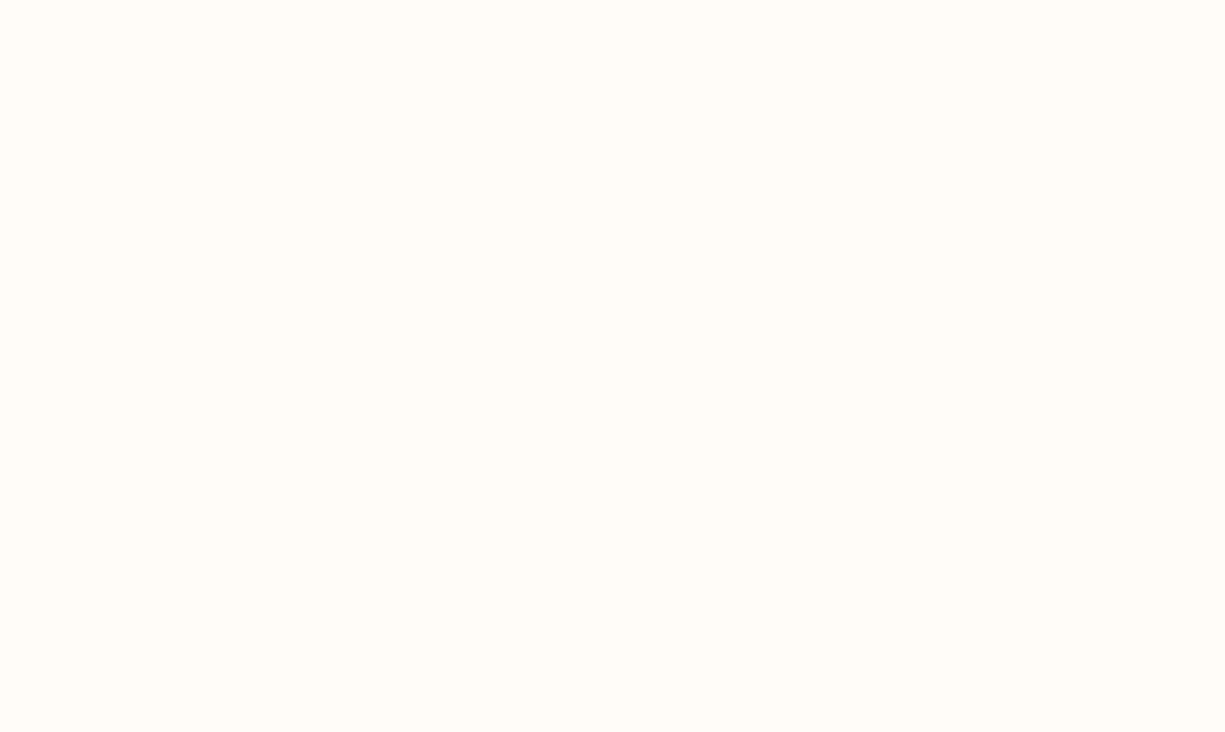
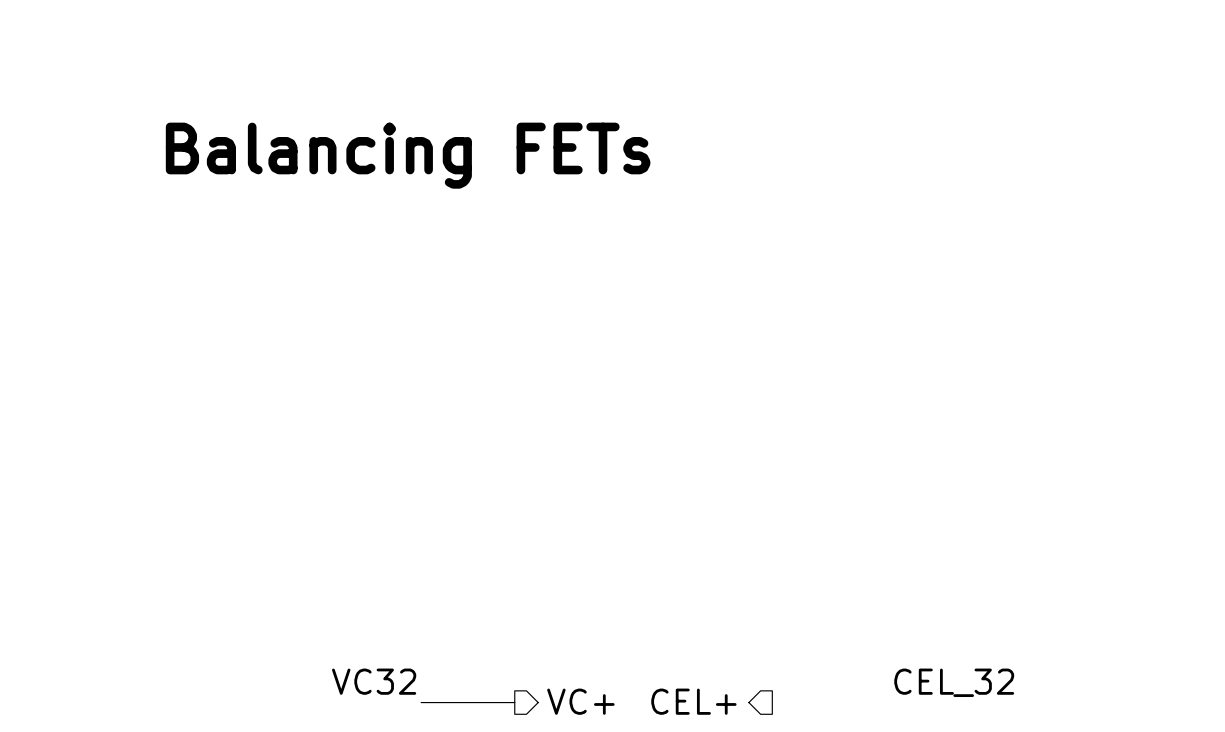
text: none -> Balancing FETs (408, 155)
label: none -> VC32 (374, 681)
label: none -> CEL_32 (954, 682)
sheet pin: none -> VC+ (580, 701)
sheet pin: none -> CEL+ (693, 701)
wire: none -> (421, 702) (514, 702)

